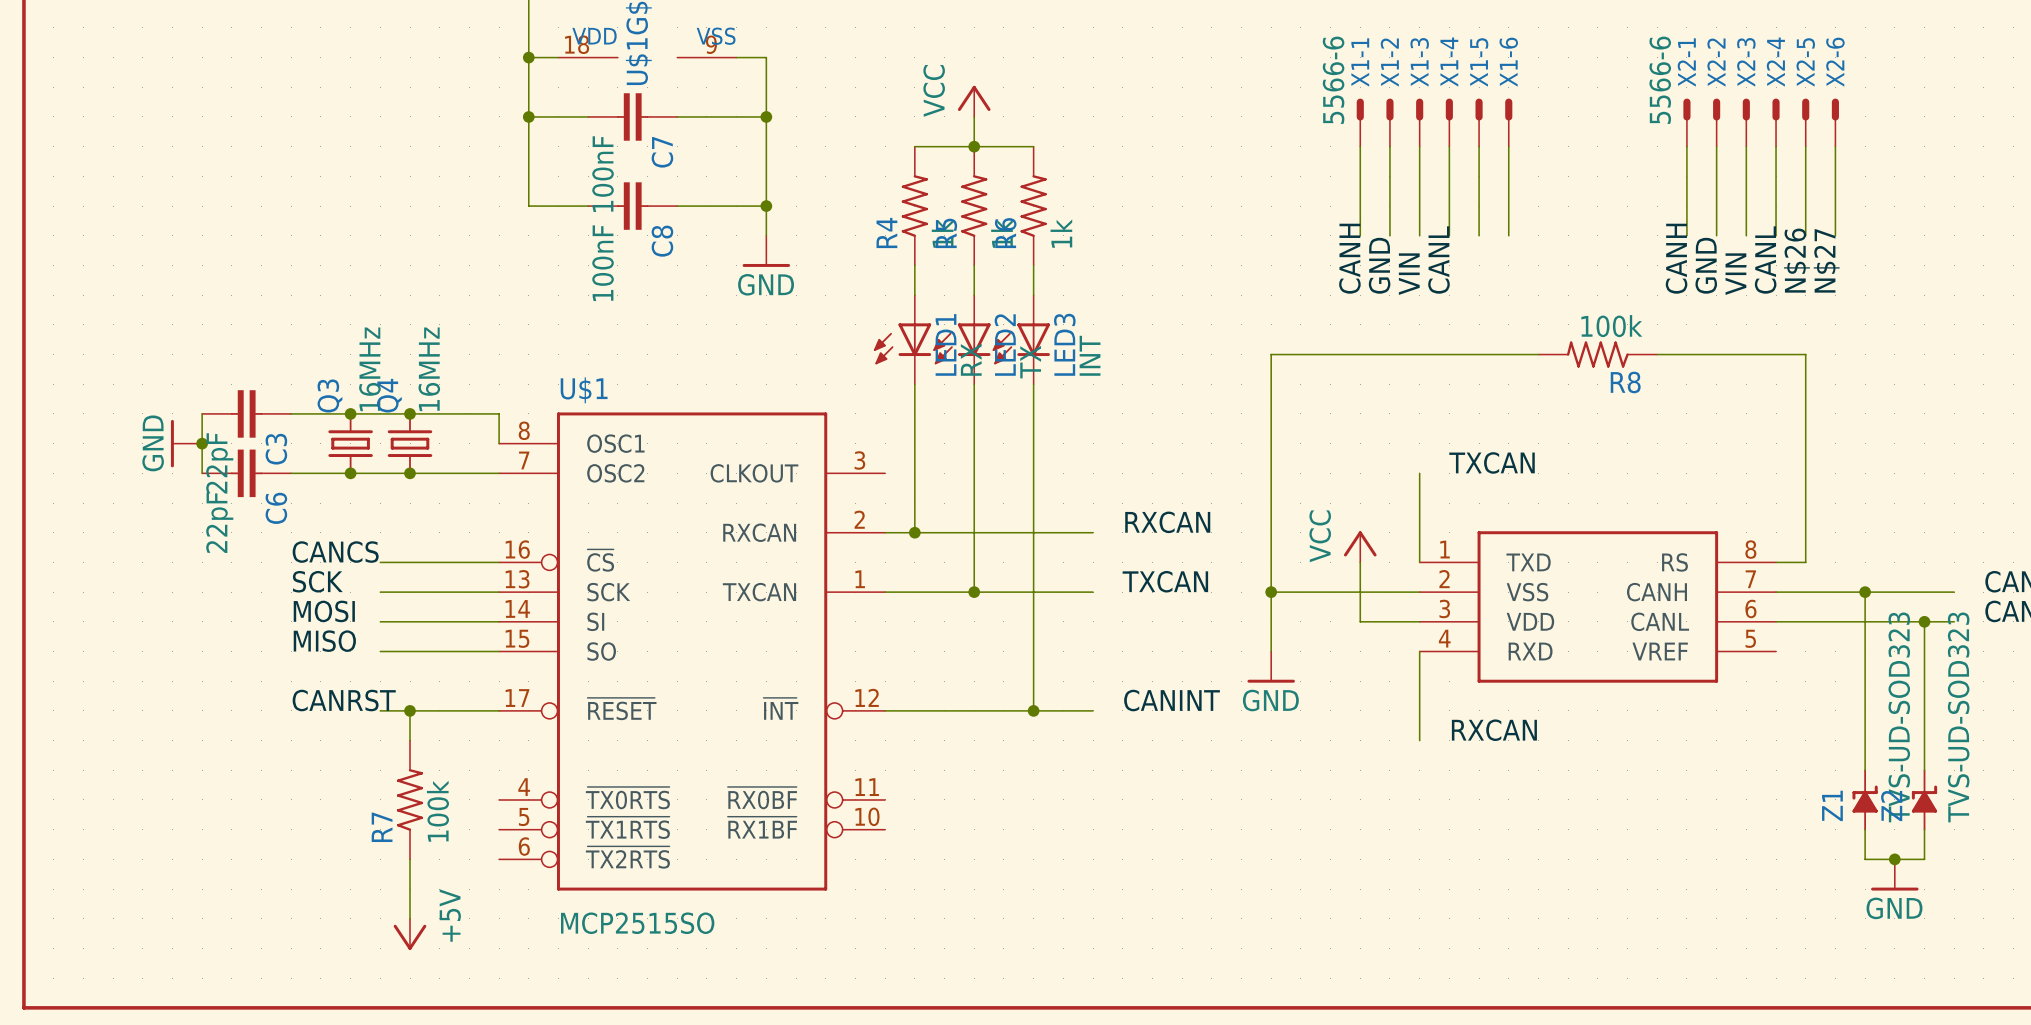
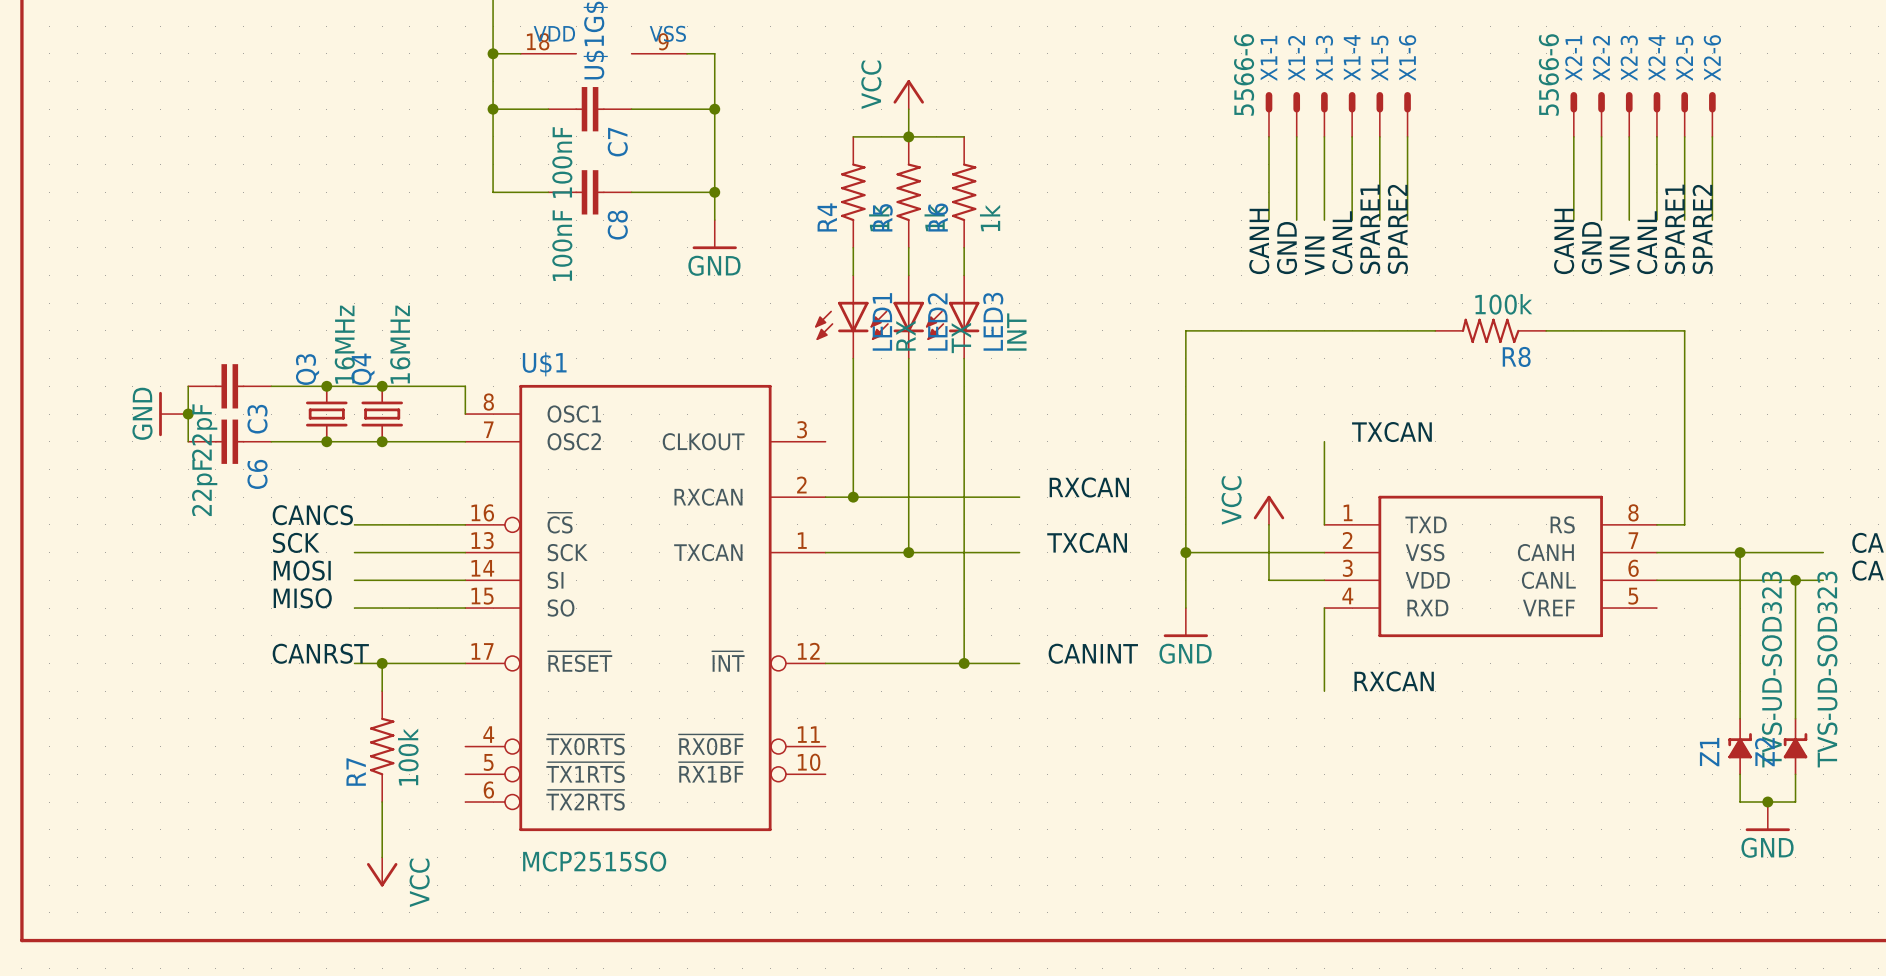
label: none -> SPARE1 (1370, 229)
label: none -> SPARE2 (1397, 229)
label: N$26 (1796, 260) -> SPARE1 (1674, 229)
label: N$27 (1826, 260) -> SPARE2 (1702, 229)
power symbol: +5V (410, 934) -> VCC (382, 871)

